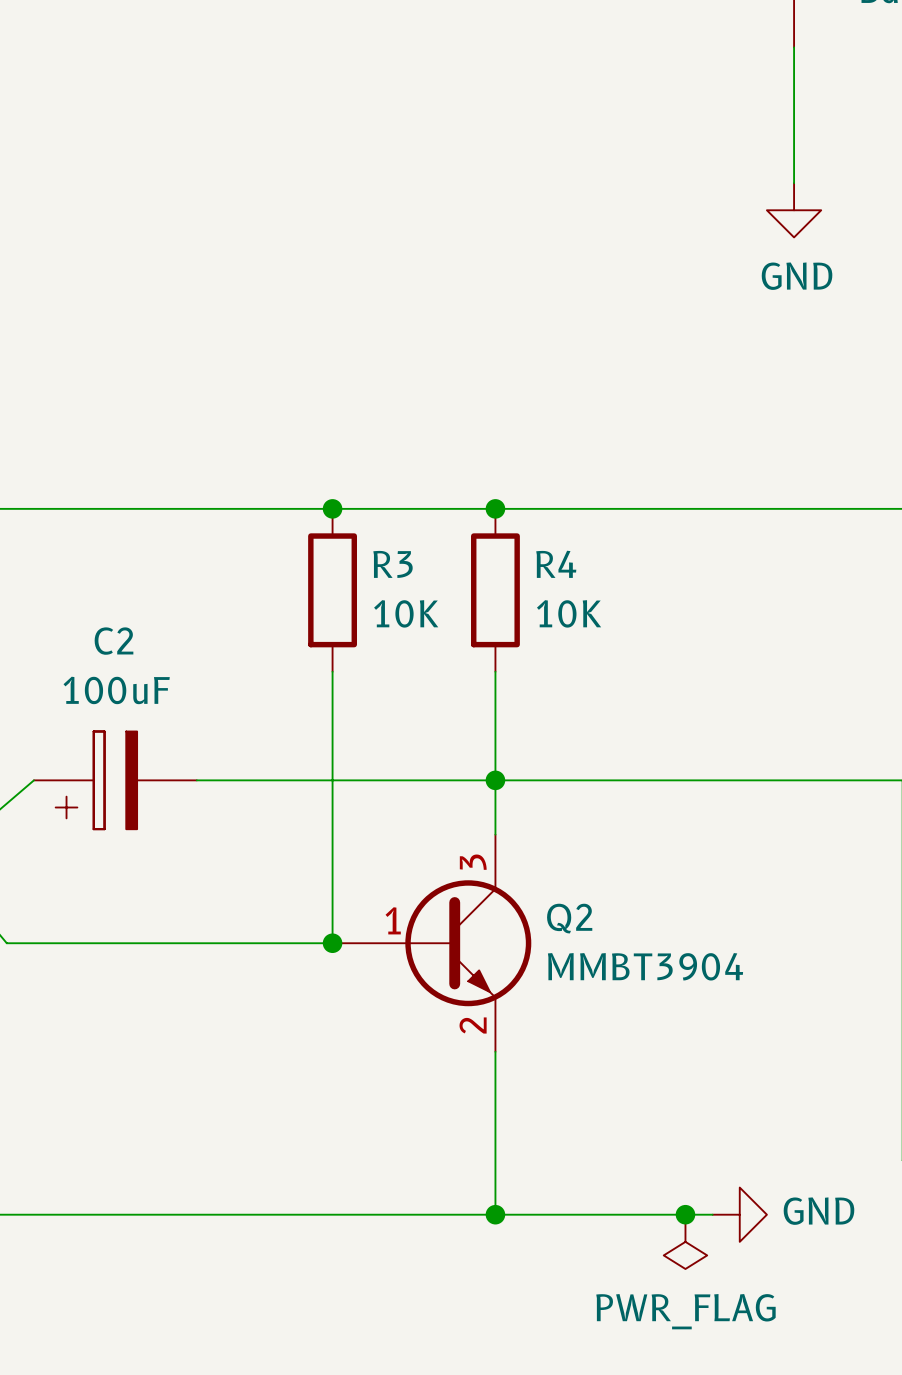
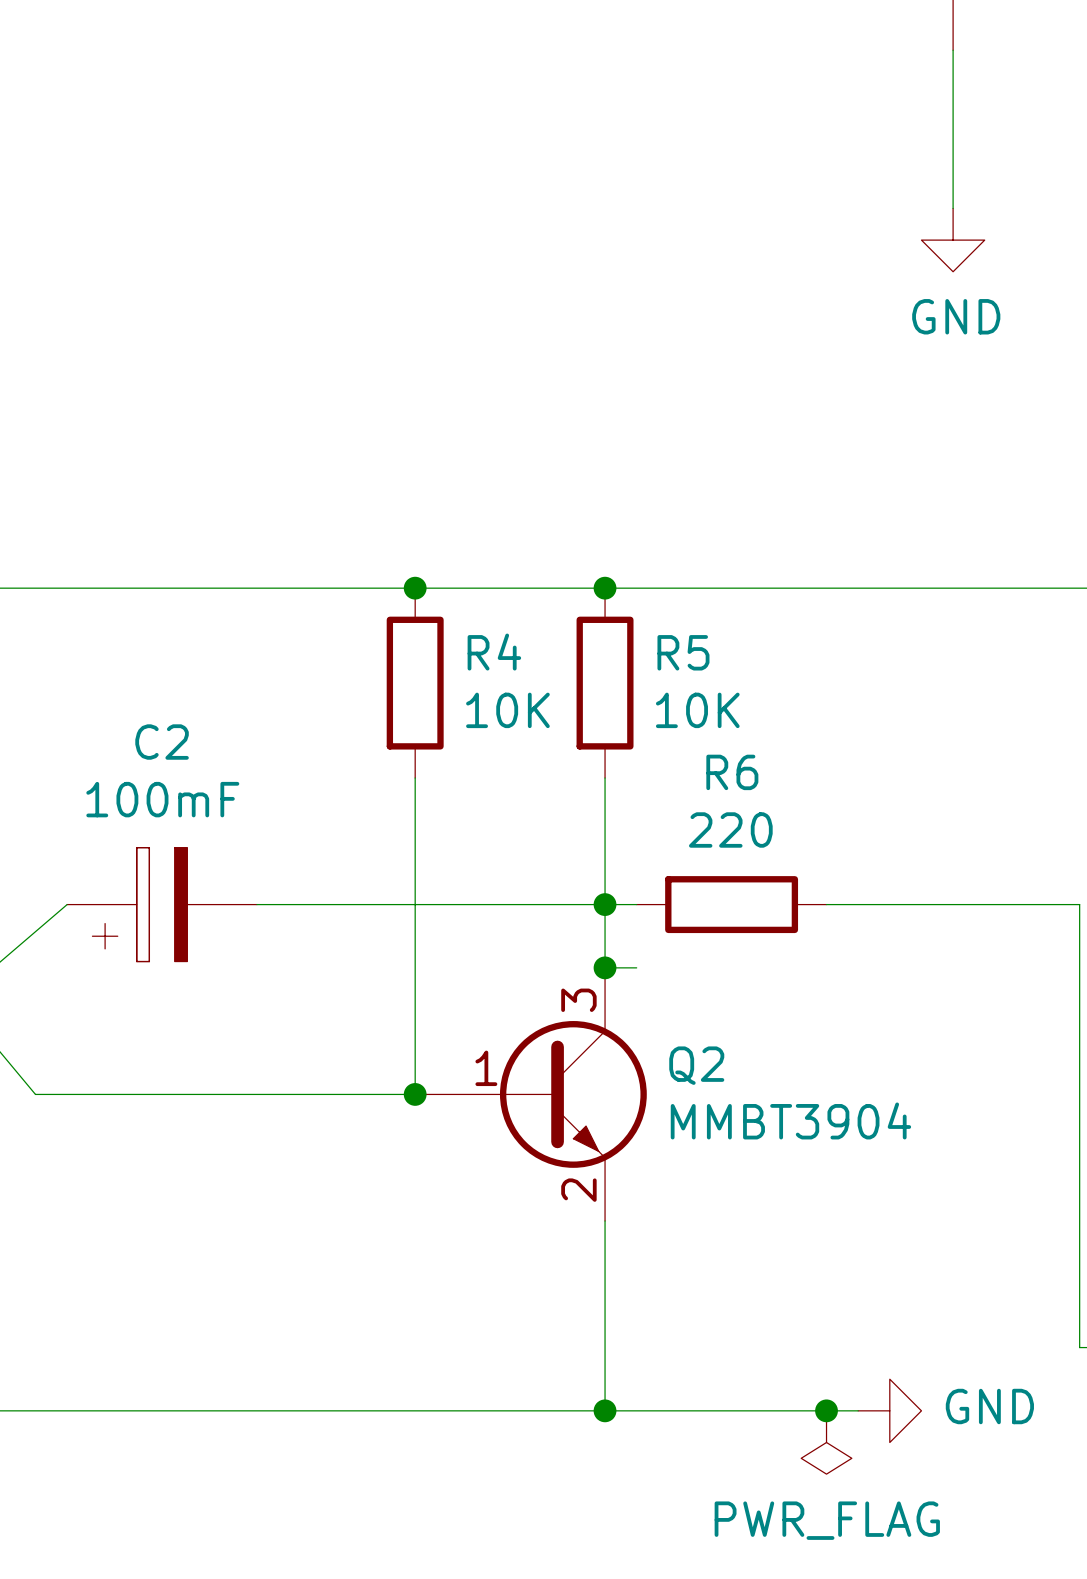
R3 name: R3 (393, 564) -> R4 (494, 652)
R4 name: R4 (556, 564) -> R5 (683, 652)
C2 value: 100uF (116, 690) -> 100mF (162, 799)
wire: (522, 780) (685, 780) -> none
R6: none -> 220 (731, 904)
wire: none -> (605, 967) (636, 967)
junction: none -> (605, 967)

